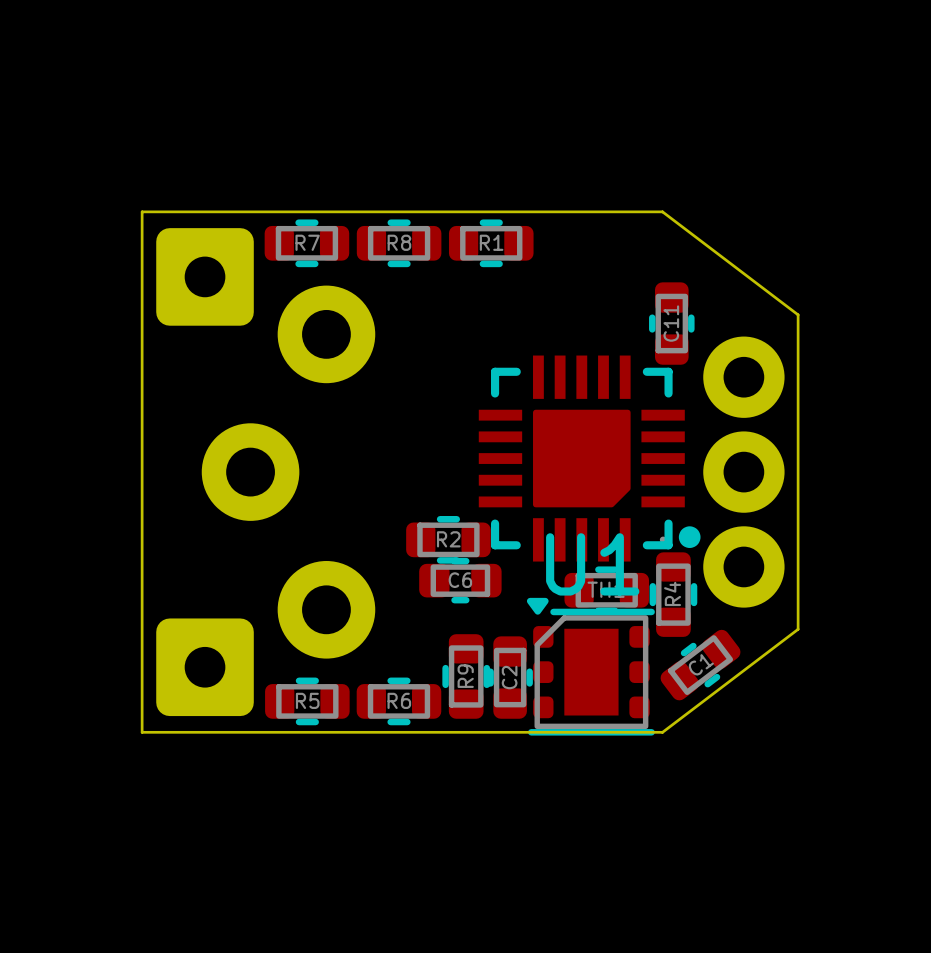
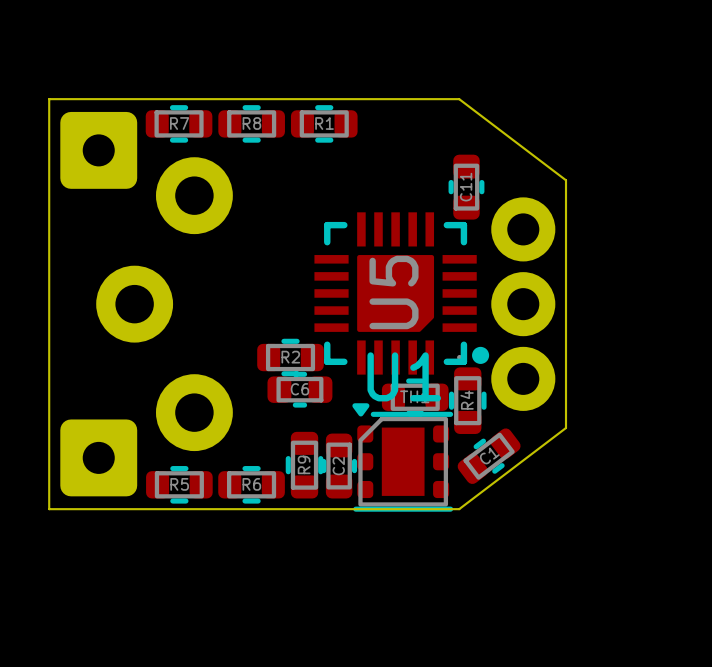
U5 name: none -> U5 (393, 292)

